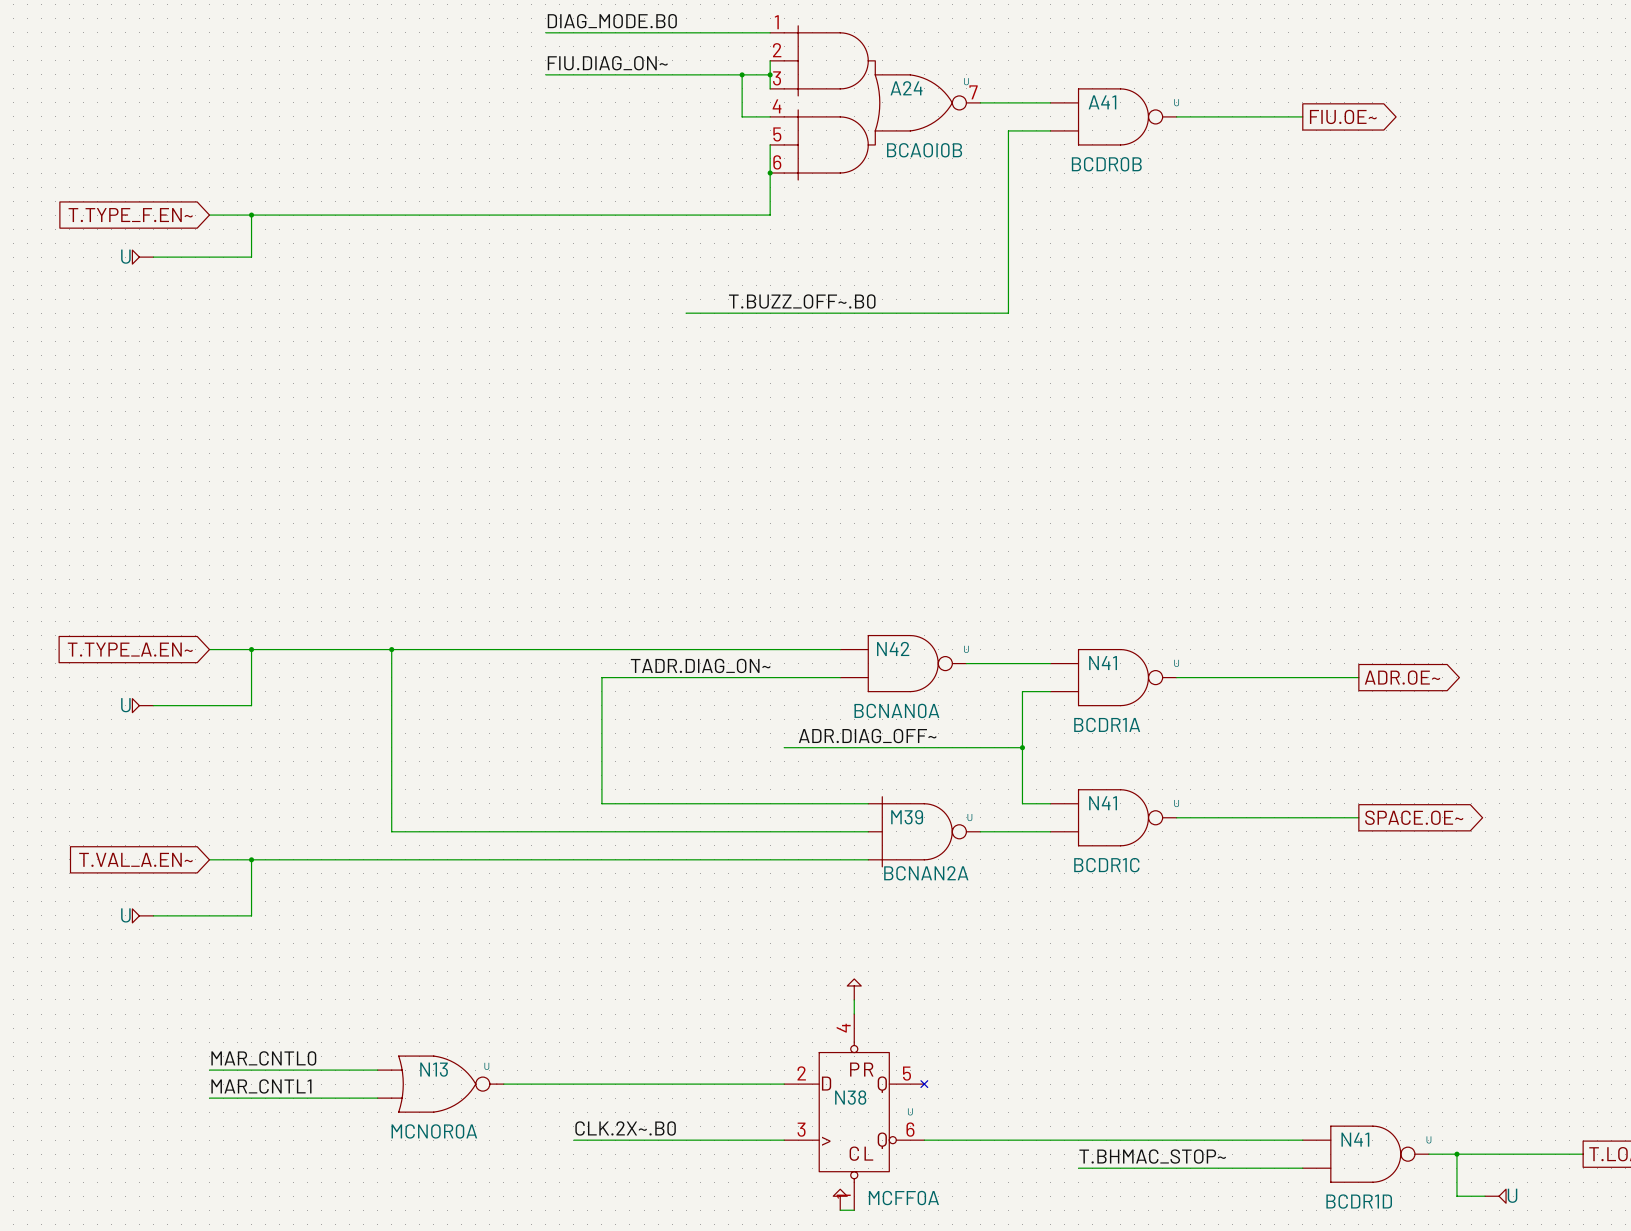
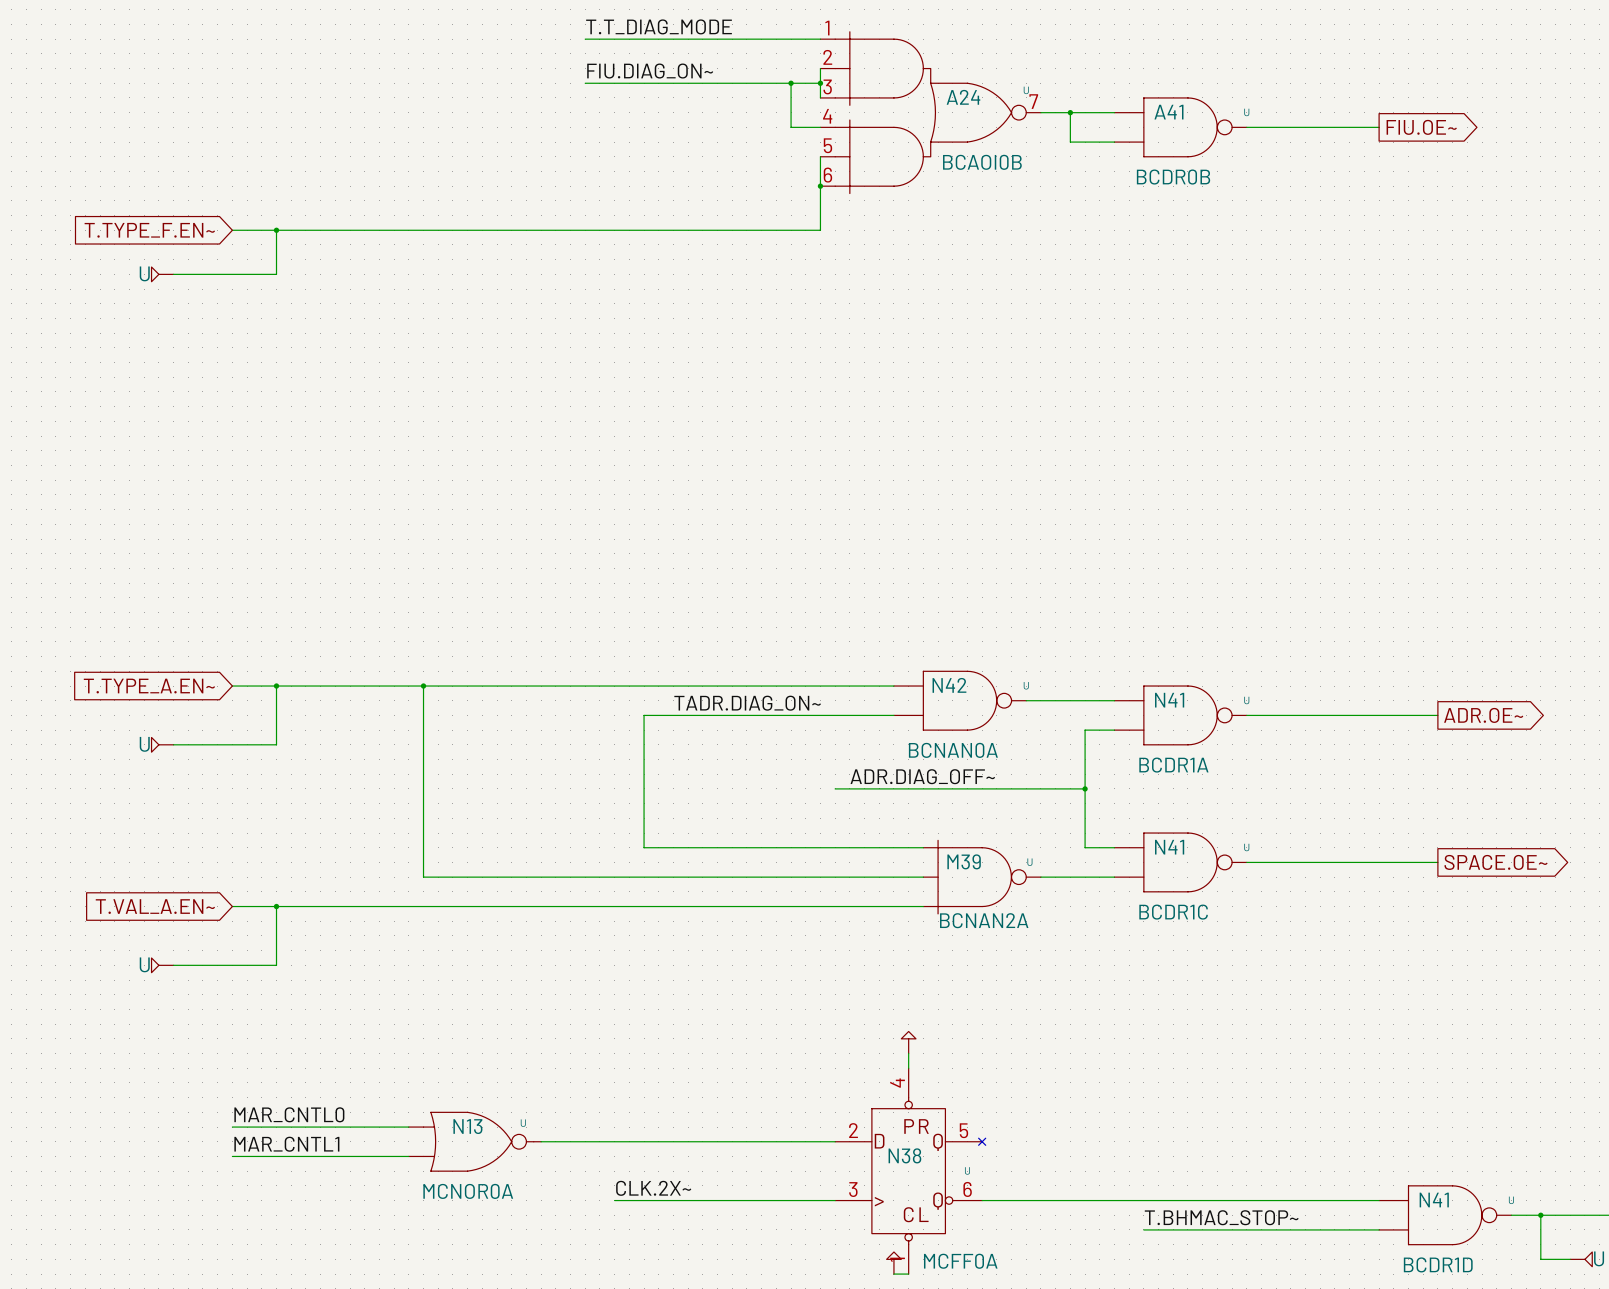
label: DIAG_MODE.B0 (612, 21) -> T.T_DIAG_MODE (659, 26)
junction: none -> (1070, 112)
wire: (1008, 130) (1008, 313) (686, 313) -> (1070, 142) (1070, 112)
label: T.BUZZ_OFF~.B0 (802, 301) -> none
label: CLK.2X~.B0 (625, 1128) -> CLK.2X~ (653, 1188)

